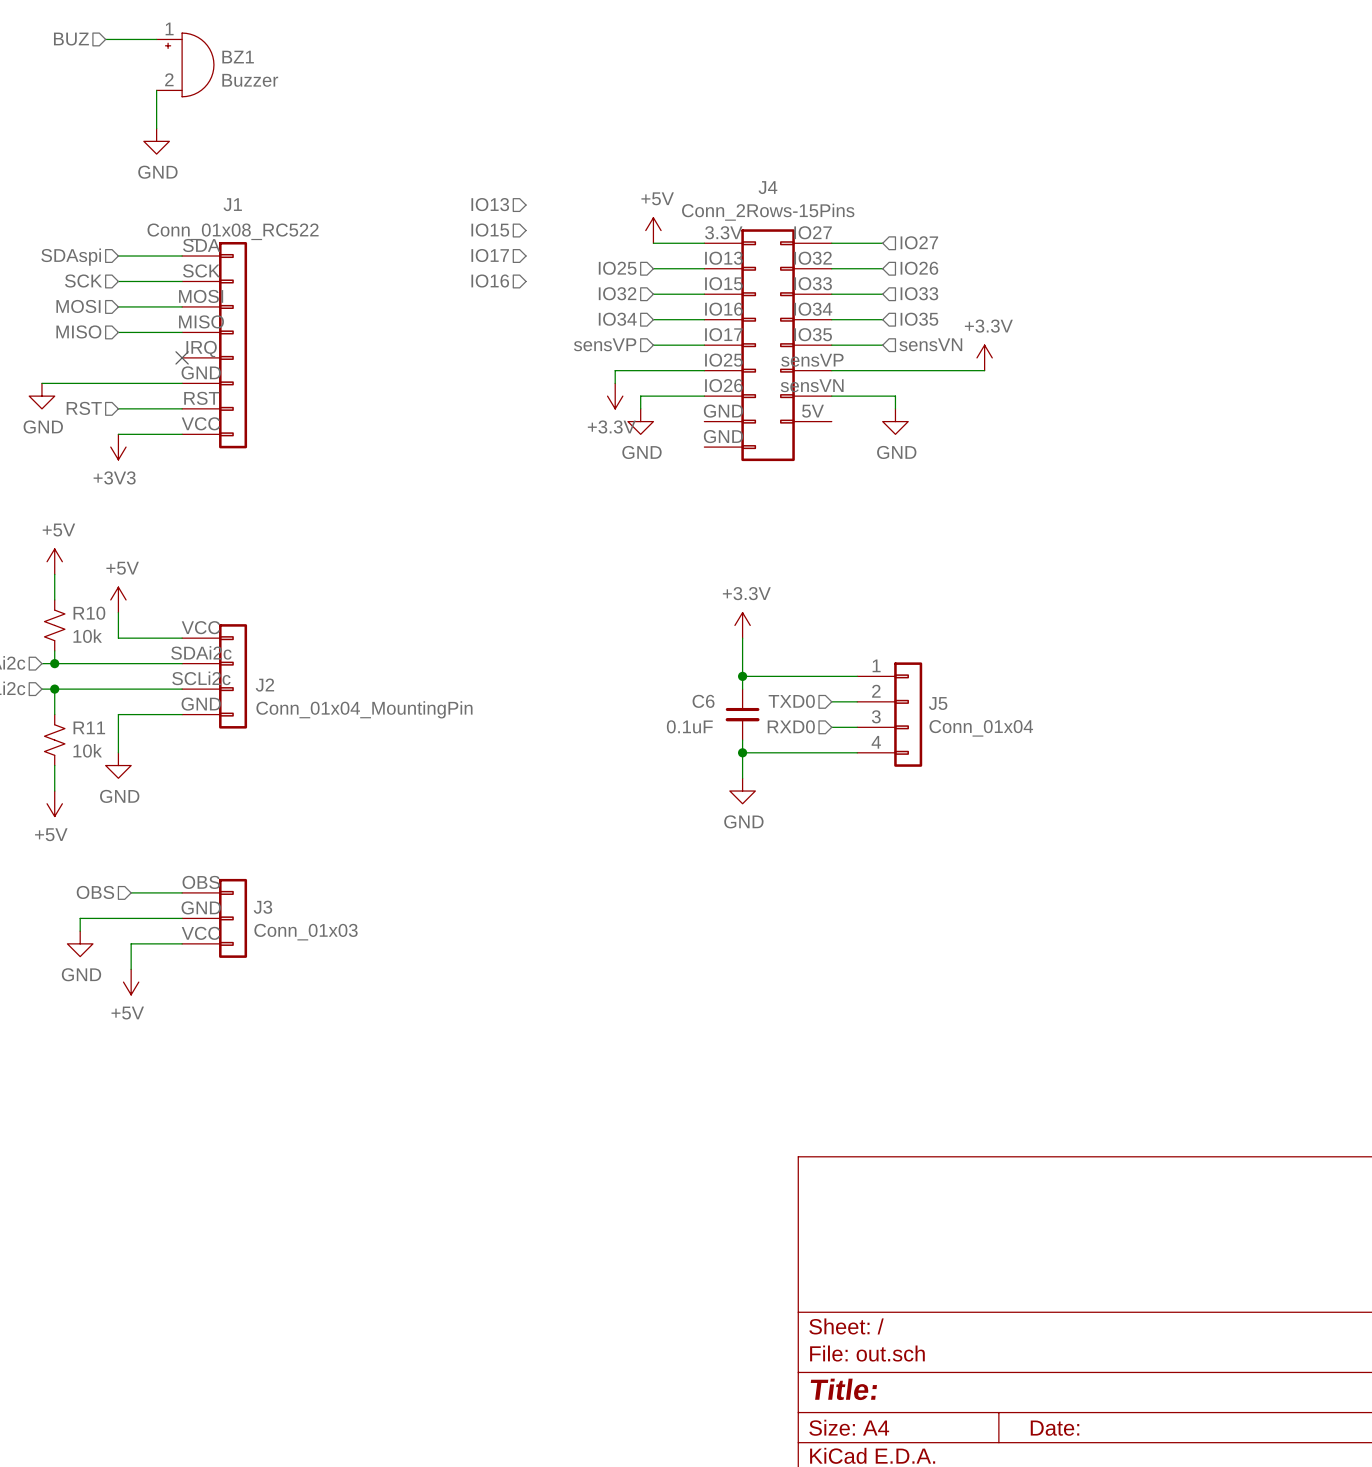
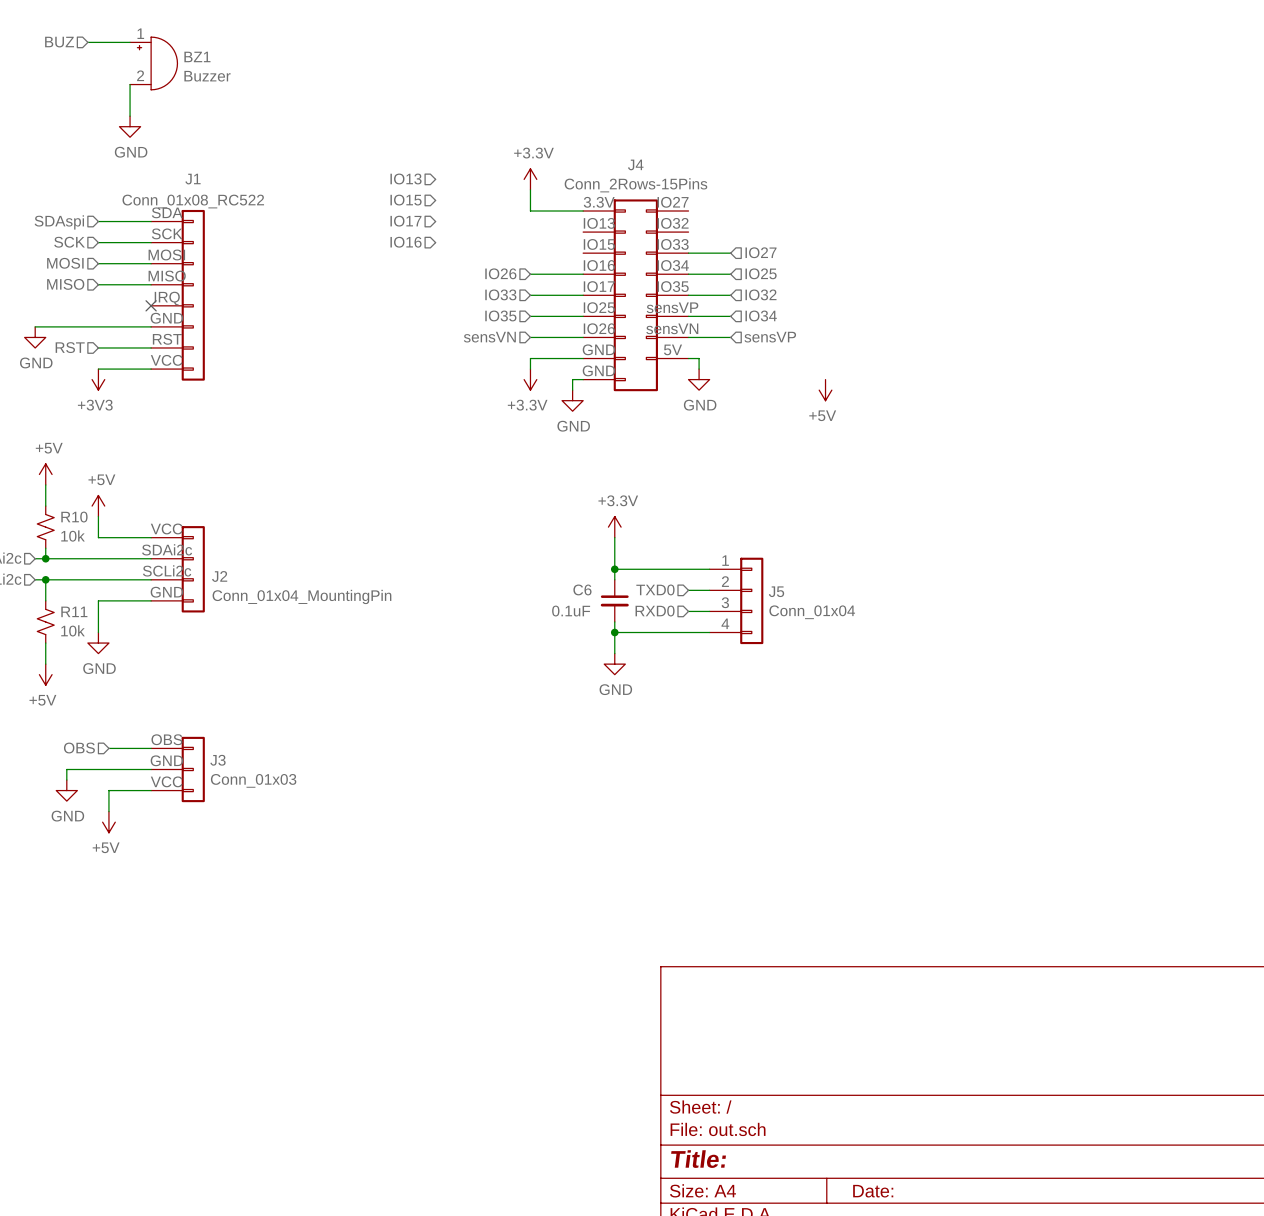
power symbol: none -> +3.3V (530, 179)
wire: none -> (530, 189) (530, 211) (541, 211)
power symbol: +5V (653, 230) -> none
hierarchical label: IO27 (919, 242) -> none
wire: (831, 243) (882, 243) -> none
hierarchical label: IO25 (617, 268) -> none
wire: (653, 268) (704, 268) -> none
wire: (831, 268) (882, 268) -> none
hierarchical label: IO26 (919, 268) -> none
hierarchical label: IO32 (617, 293) -> IO26 (500, 273)
hierarchical label: IO33 (919, 293) -> IO27 (760, 252)
wire: (653, 294) (704, 294) -> none
hierarchical label: IO34 (617, 319) -> IO33 (500, 294)
wire: none -> (530, 274) (541, 274)
hierarchical label: IO35 (919, 319) -> IO25 (761, 273)
hierarchical label: sensVP (605, 344) -> none
hierarchical label: sensVN (930, 344) -> IO32 (760, 294)
wire: none -> (530, 295) (541, 295)
power symbol: +3.3V (984, 357) -> none
hierarchical label: none -> IO35 (500, 315)
wire: (640, 370) (615, 370) (615, 383) -> none
wire: (882, 370) (984, 370) -> none
hierarchical label: none -> IO34 (761, 315)
hierarchical label: none -> sensVN (489, 337)
hierarchical label: none -> sensVP (770, 337)
power symbol position: +3.3V (615, 396) -> +3.3V (530, 379)
wire: (640, 396) (640, 408) -> none
wire: (882, 396) (895, 396) (895, 408) -> (688, 358) (699, 358) (699, 369)
power symbol position: GND (640, 421) -> GND (572, 400)
wire: none -> (583, 358) (530, 358) (530, 369)
power symbol position: GND (895, 421) -> GND (699, 379)
wire: none -> (583, 379) (572, 379) (572, 390)
power symbol: none -> +5V (825, 390)

